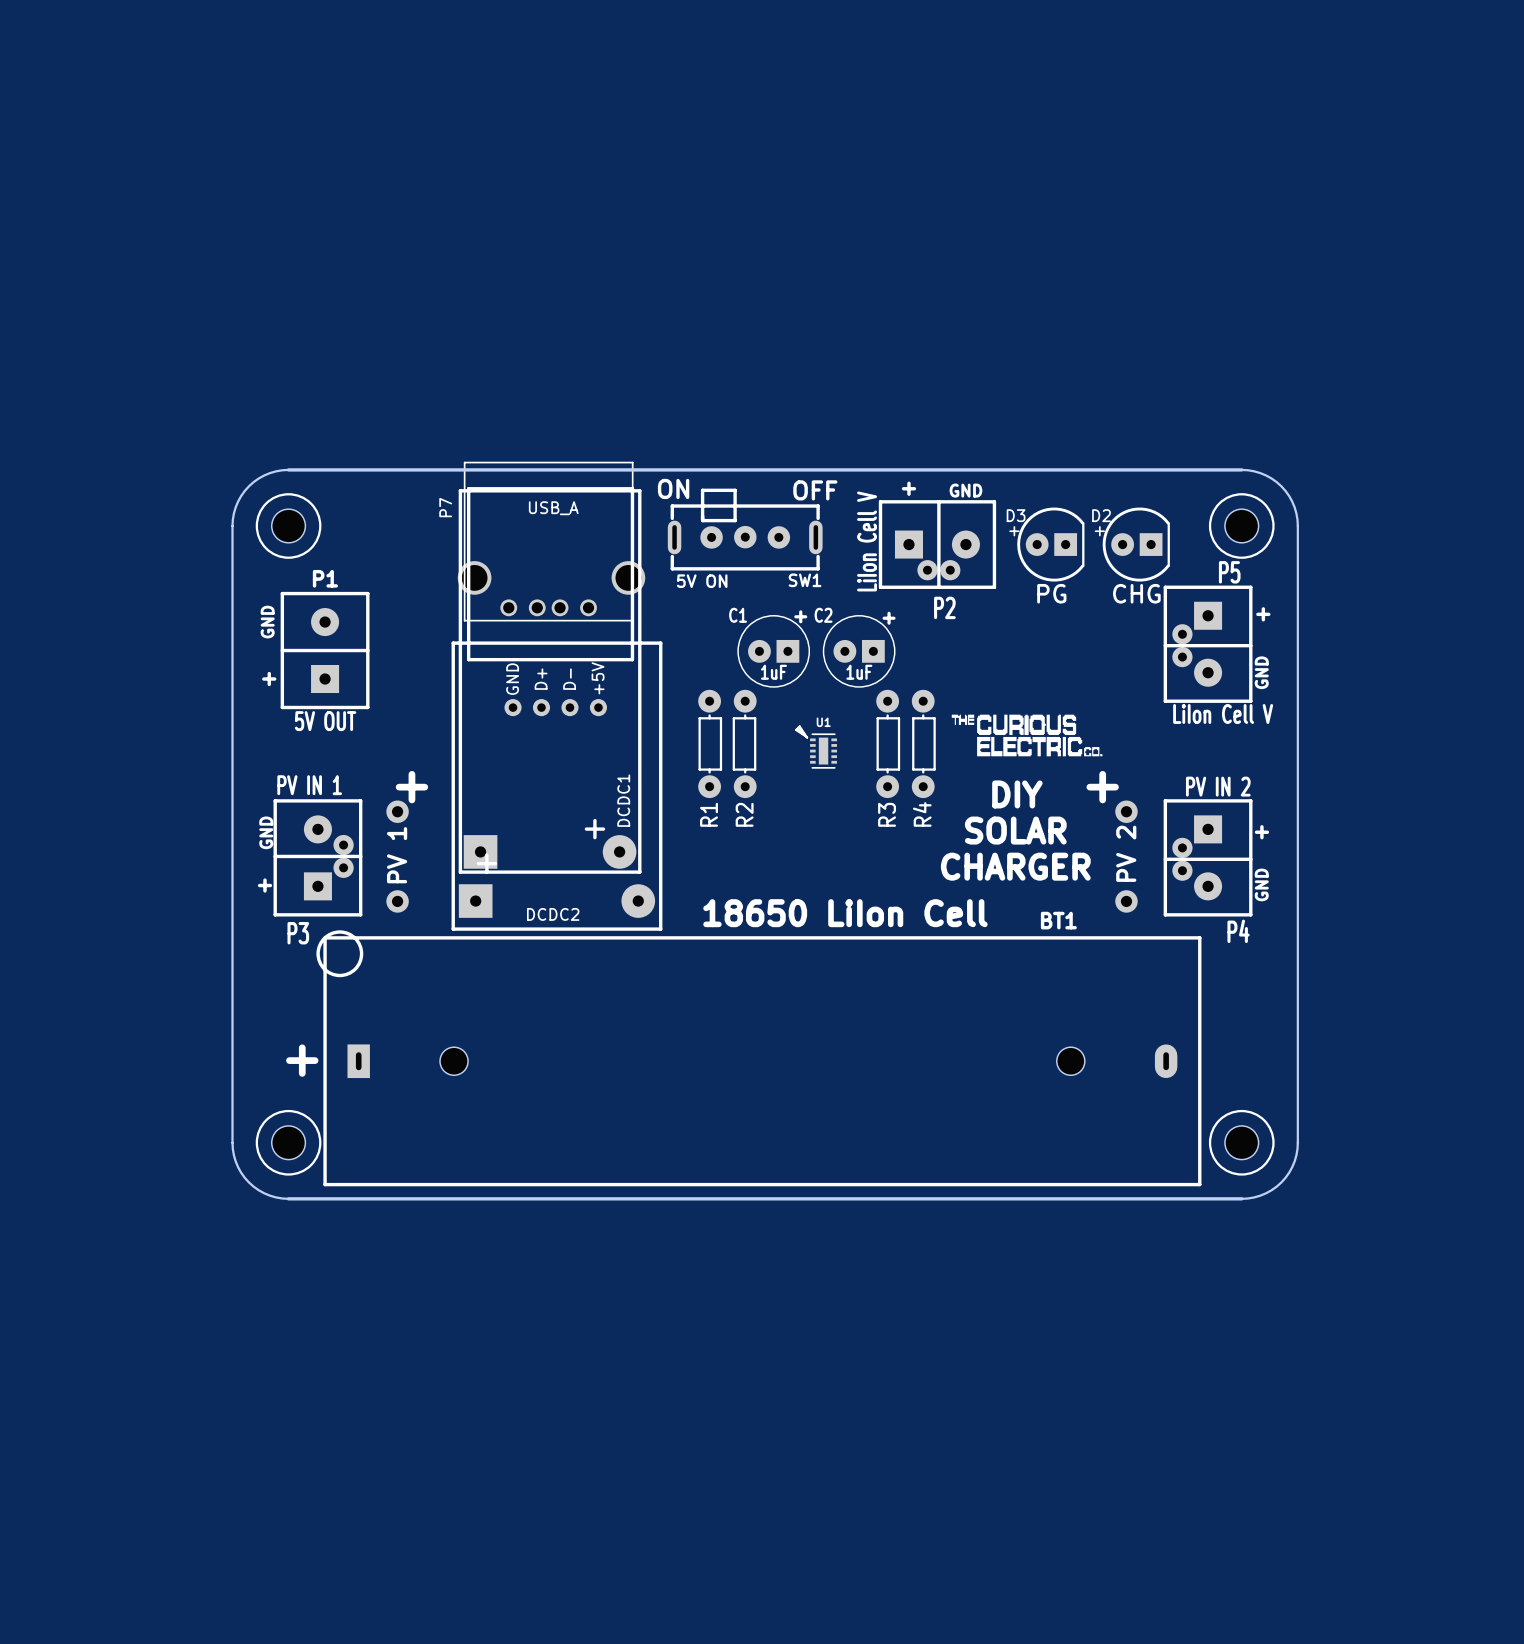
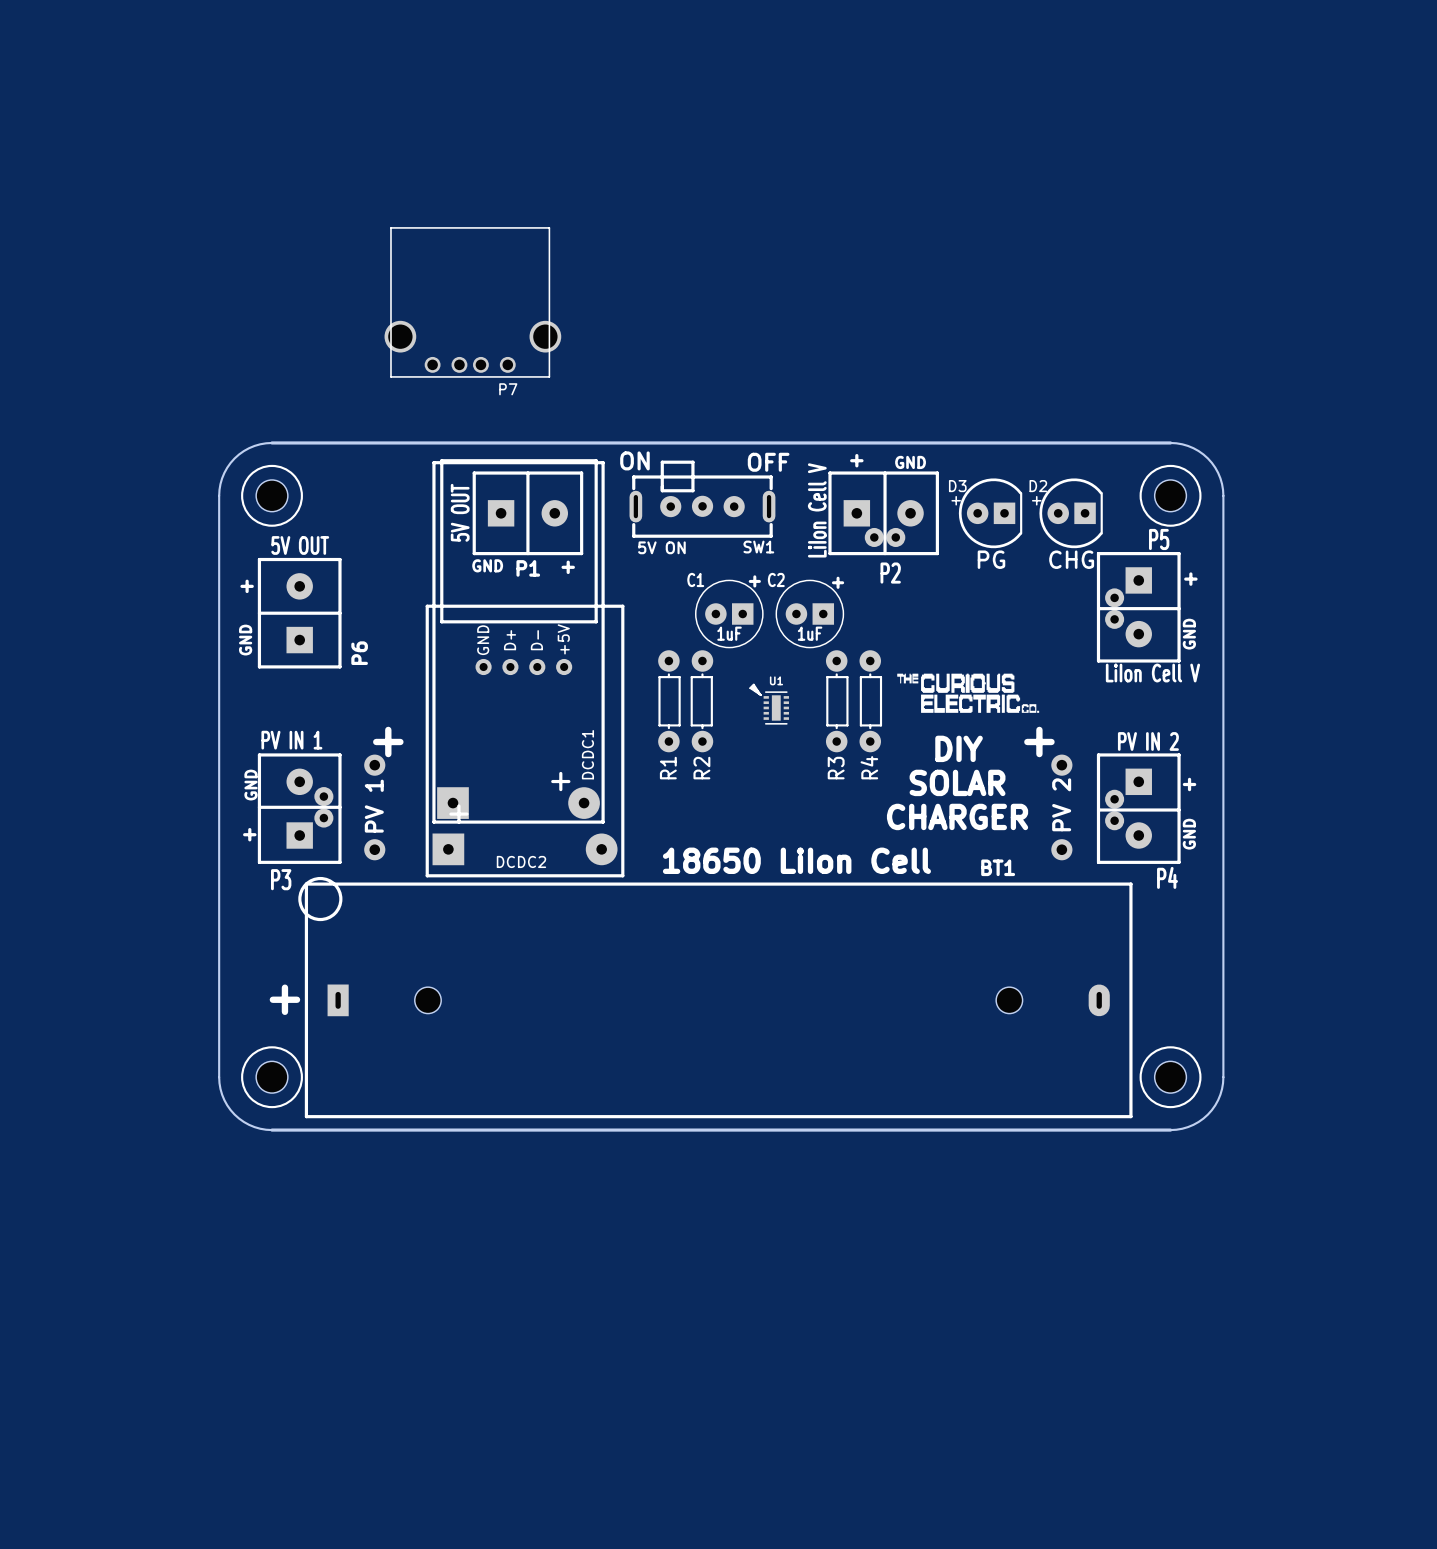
P7 name rotation: 0° (445, 507) -> 90° clockwise (508, 389)
P7 name position: P7 (445, 507) -> P7 (508, 389)
P7 value: USB_A (553, 508) -> none
P7 position: (551, 541) -> (472, 302)
P1 name position: P1 (325, 578) -> P1 (528, 568)
P1 footprint: [280, 591, 370, 710] -> [472, 471, 584, 556]
P6: none -> 5V OUT (299, 613)
P1 value position: 5V OUT (325, 721) -> 5V OUT (460, 512)

